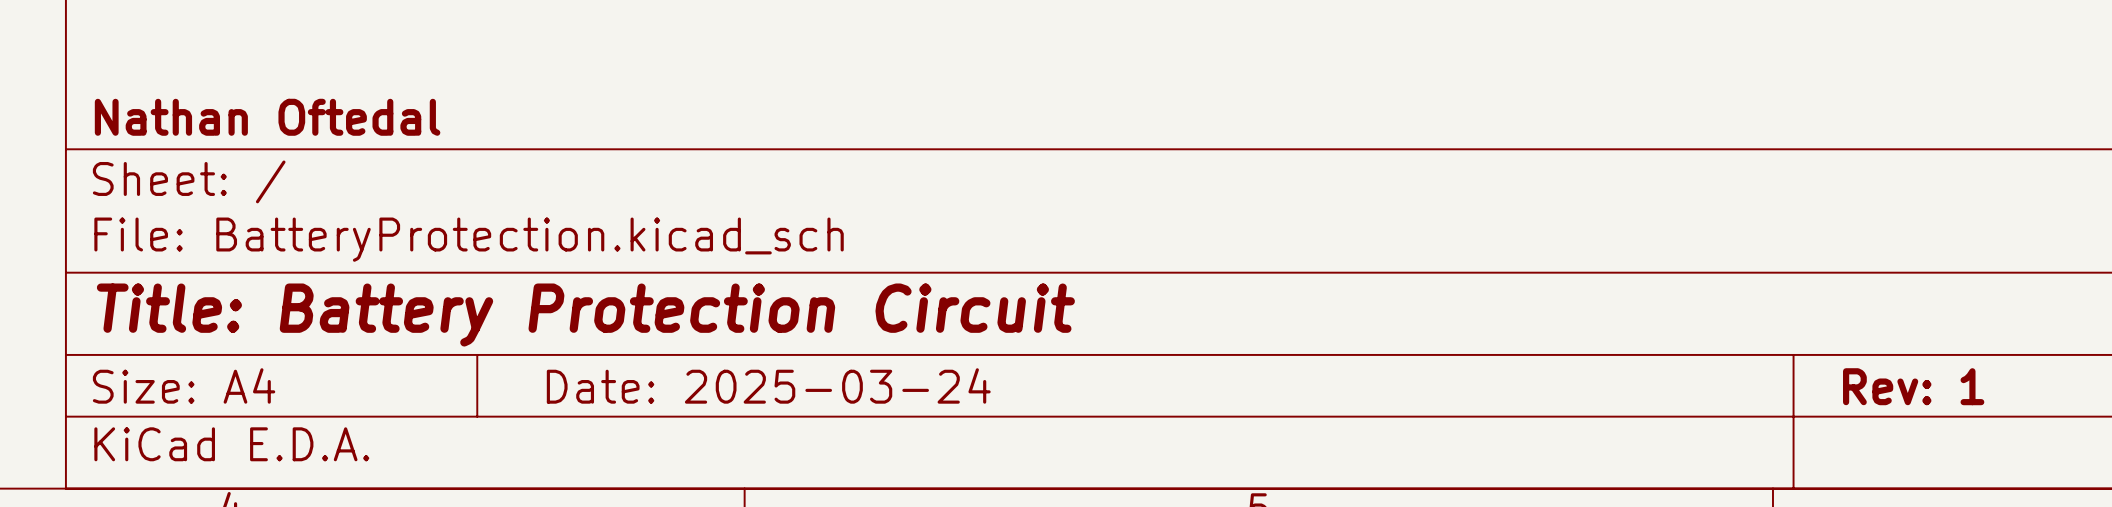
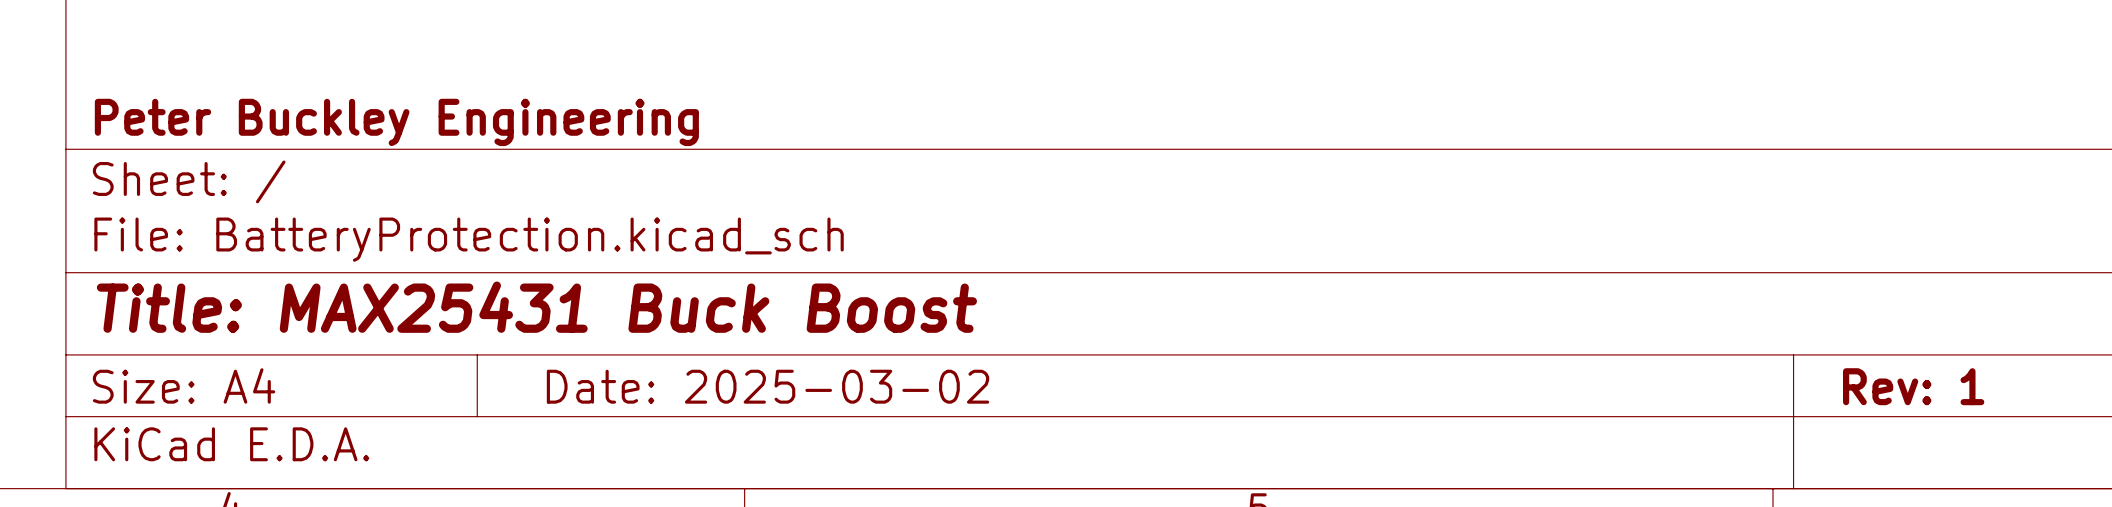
title block: Nathan Oftedal (267, 117) -> Peter Buckley Engineering (396, 122)
title block: Title: Battery Protection Circuit (585, 315) -> Title: MAX25431 Buck Boost (536, 307)
title block: Date: 2025-03-24 (768, 385) -> Date: 2025-03-02 (768, 386)

